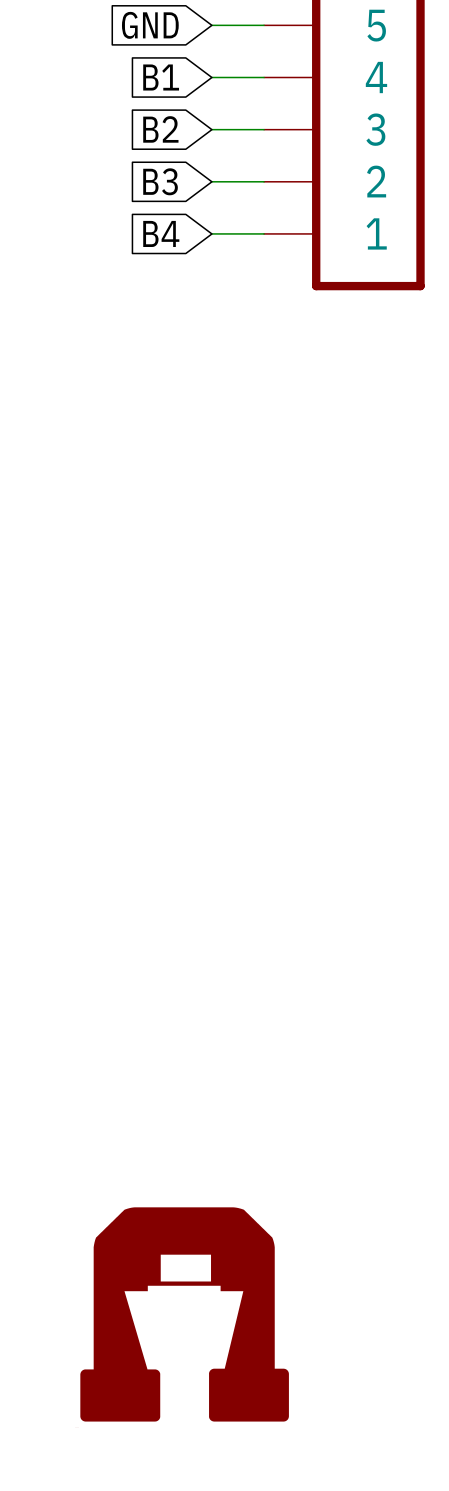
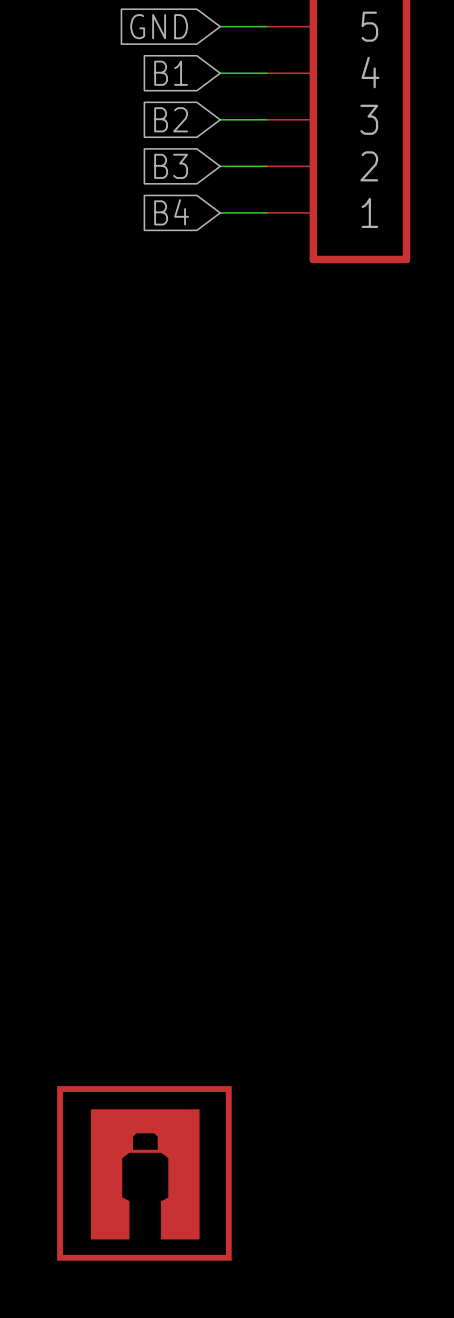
part: none -> (144, 1173)
part: (184, 1314) -> none

